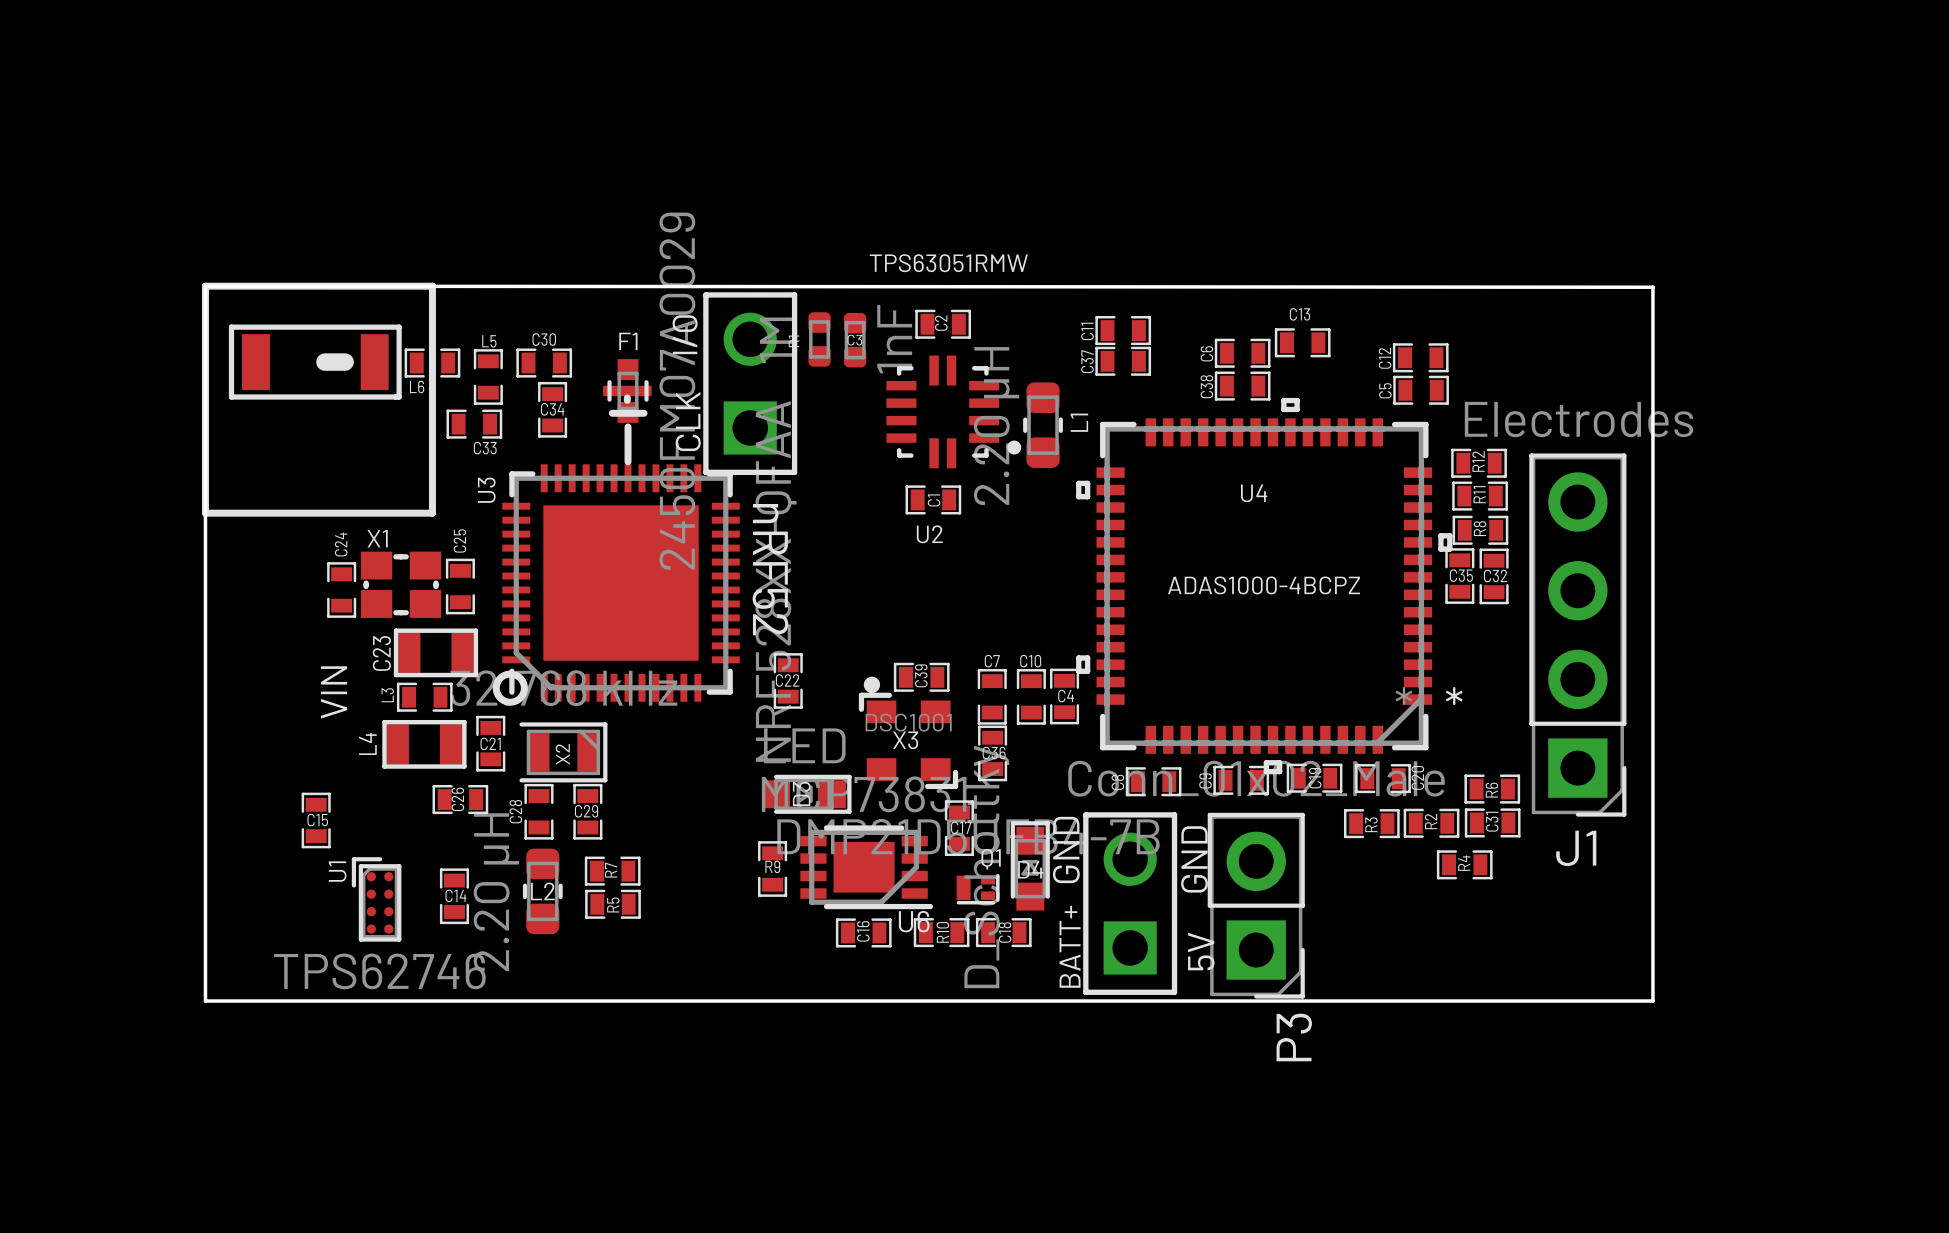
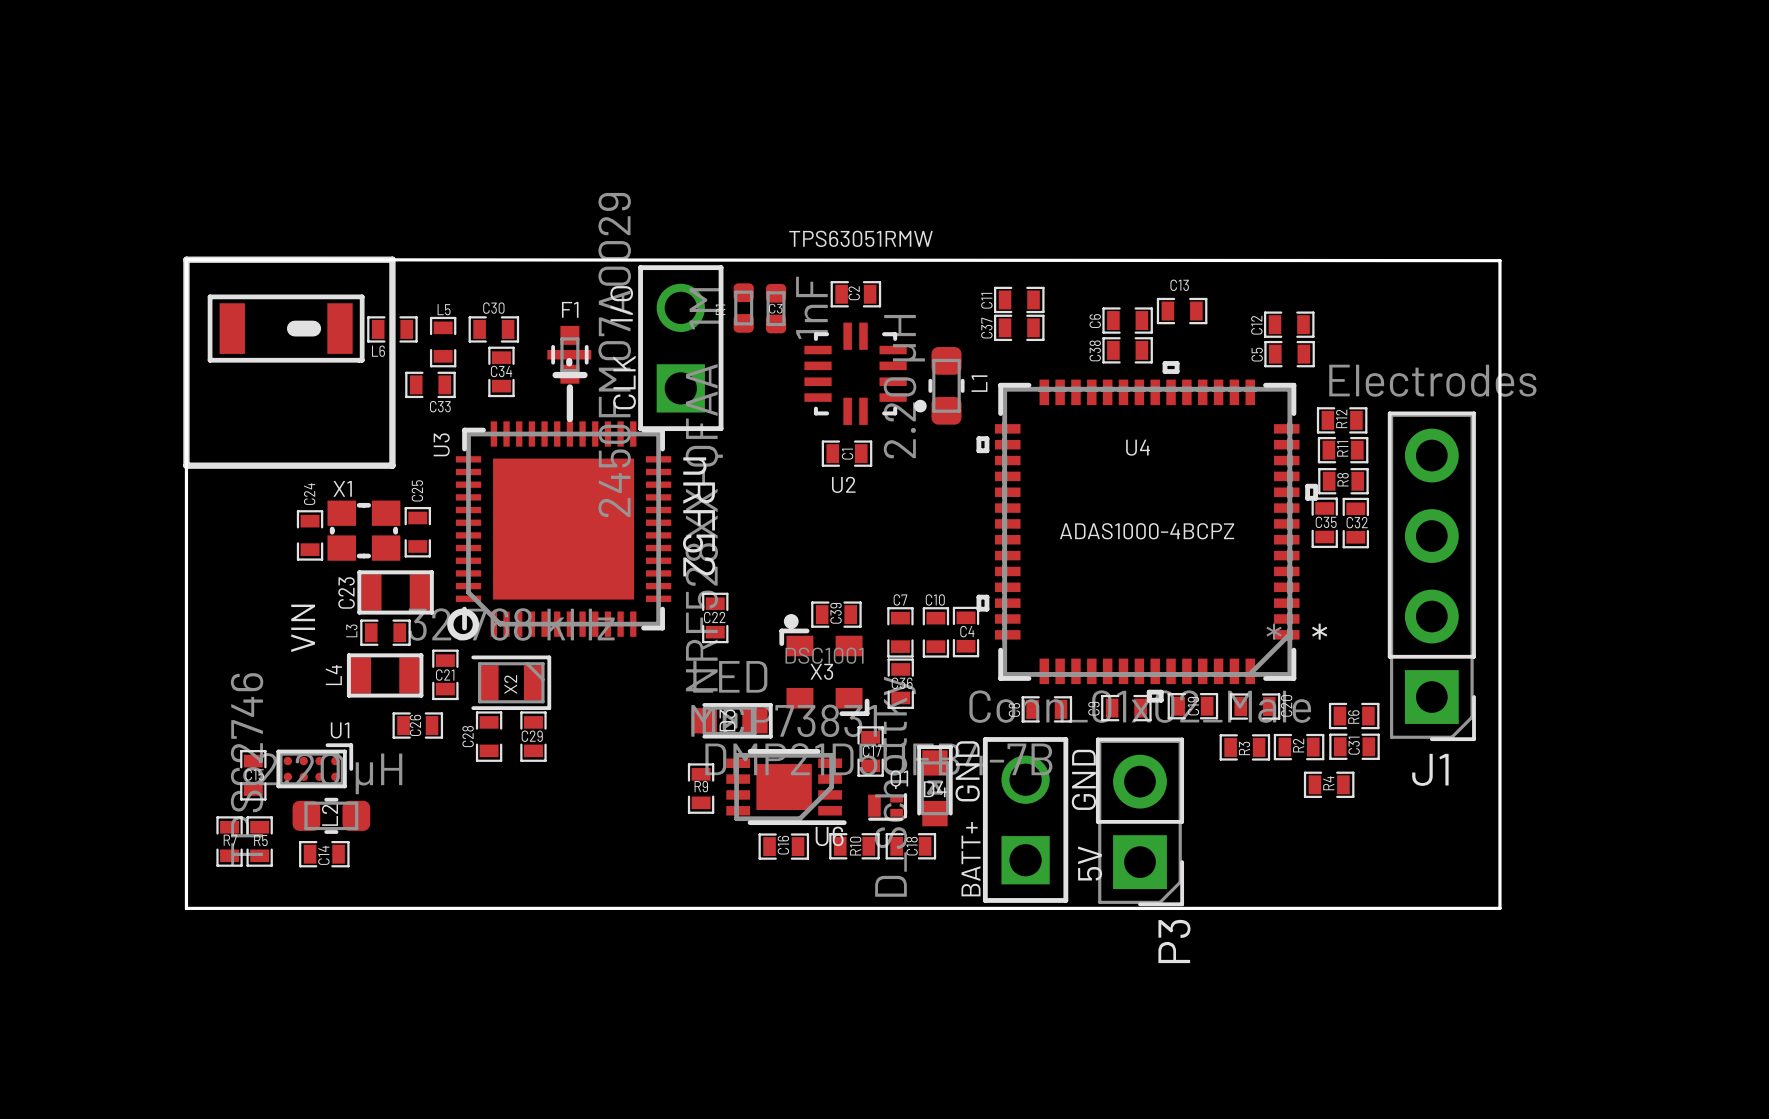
C15 position: (316, 820) -> (253, 775)
R7 rotation: 0° (612, 871) -> 90° clockwise (229, 841)
R7 position: (612, 871) -> (229, 841)
L2 rotation: 0° (542, 891) -> 90° clockwise (331, 815)
L2 position: (542, 891) -> (331, 815)
C14 rotation: 0° (454, 896) -> 90° clockwise (324, 854)
C14 position: (454, 896) -> (324, 854)
U1 rotation: 0° (376, 899) -> 90° clockwise (314, 765)
U1 position: (376, 899) -> (314, 765)
R5 rotation: 0° (613, 904) -> 90° clockwise (259, 841)
R5 position: (613, 904) -> (259, 841)

